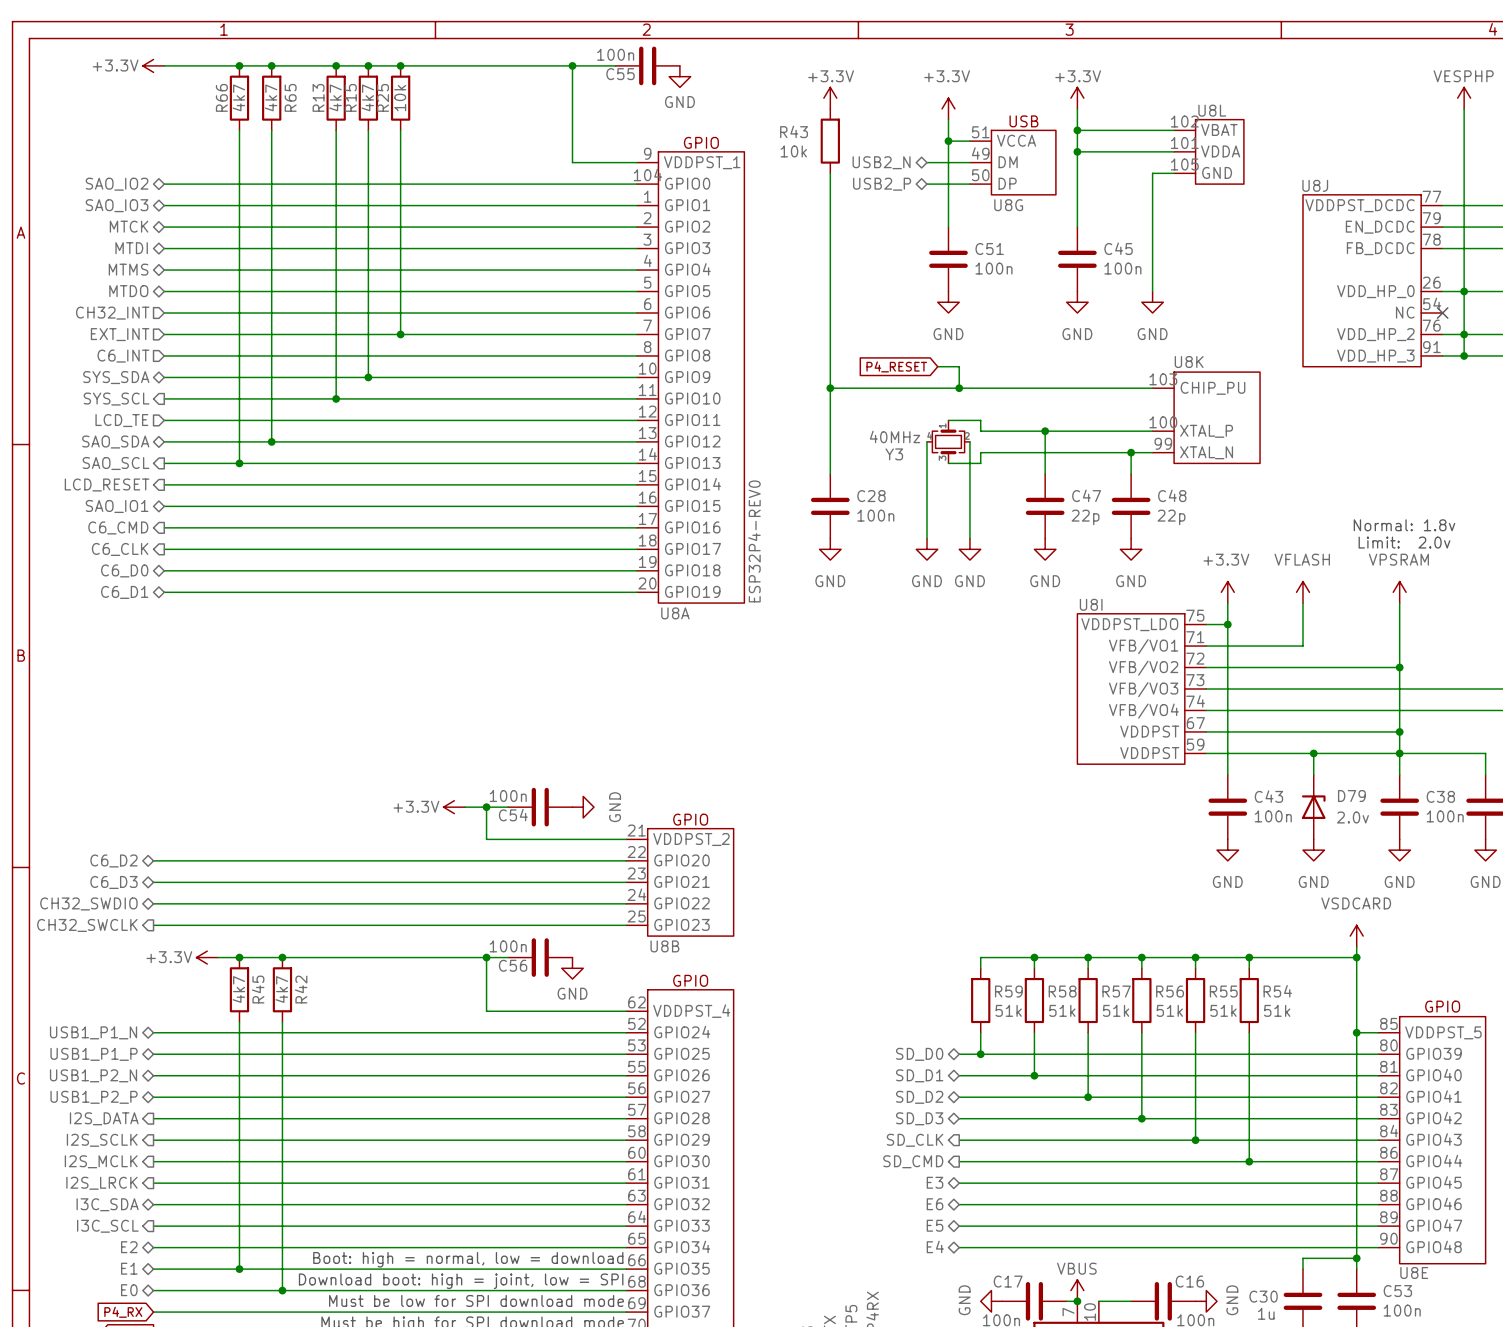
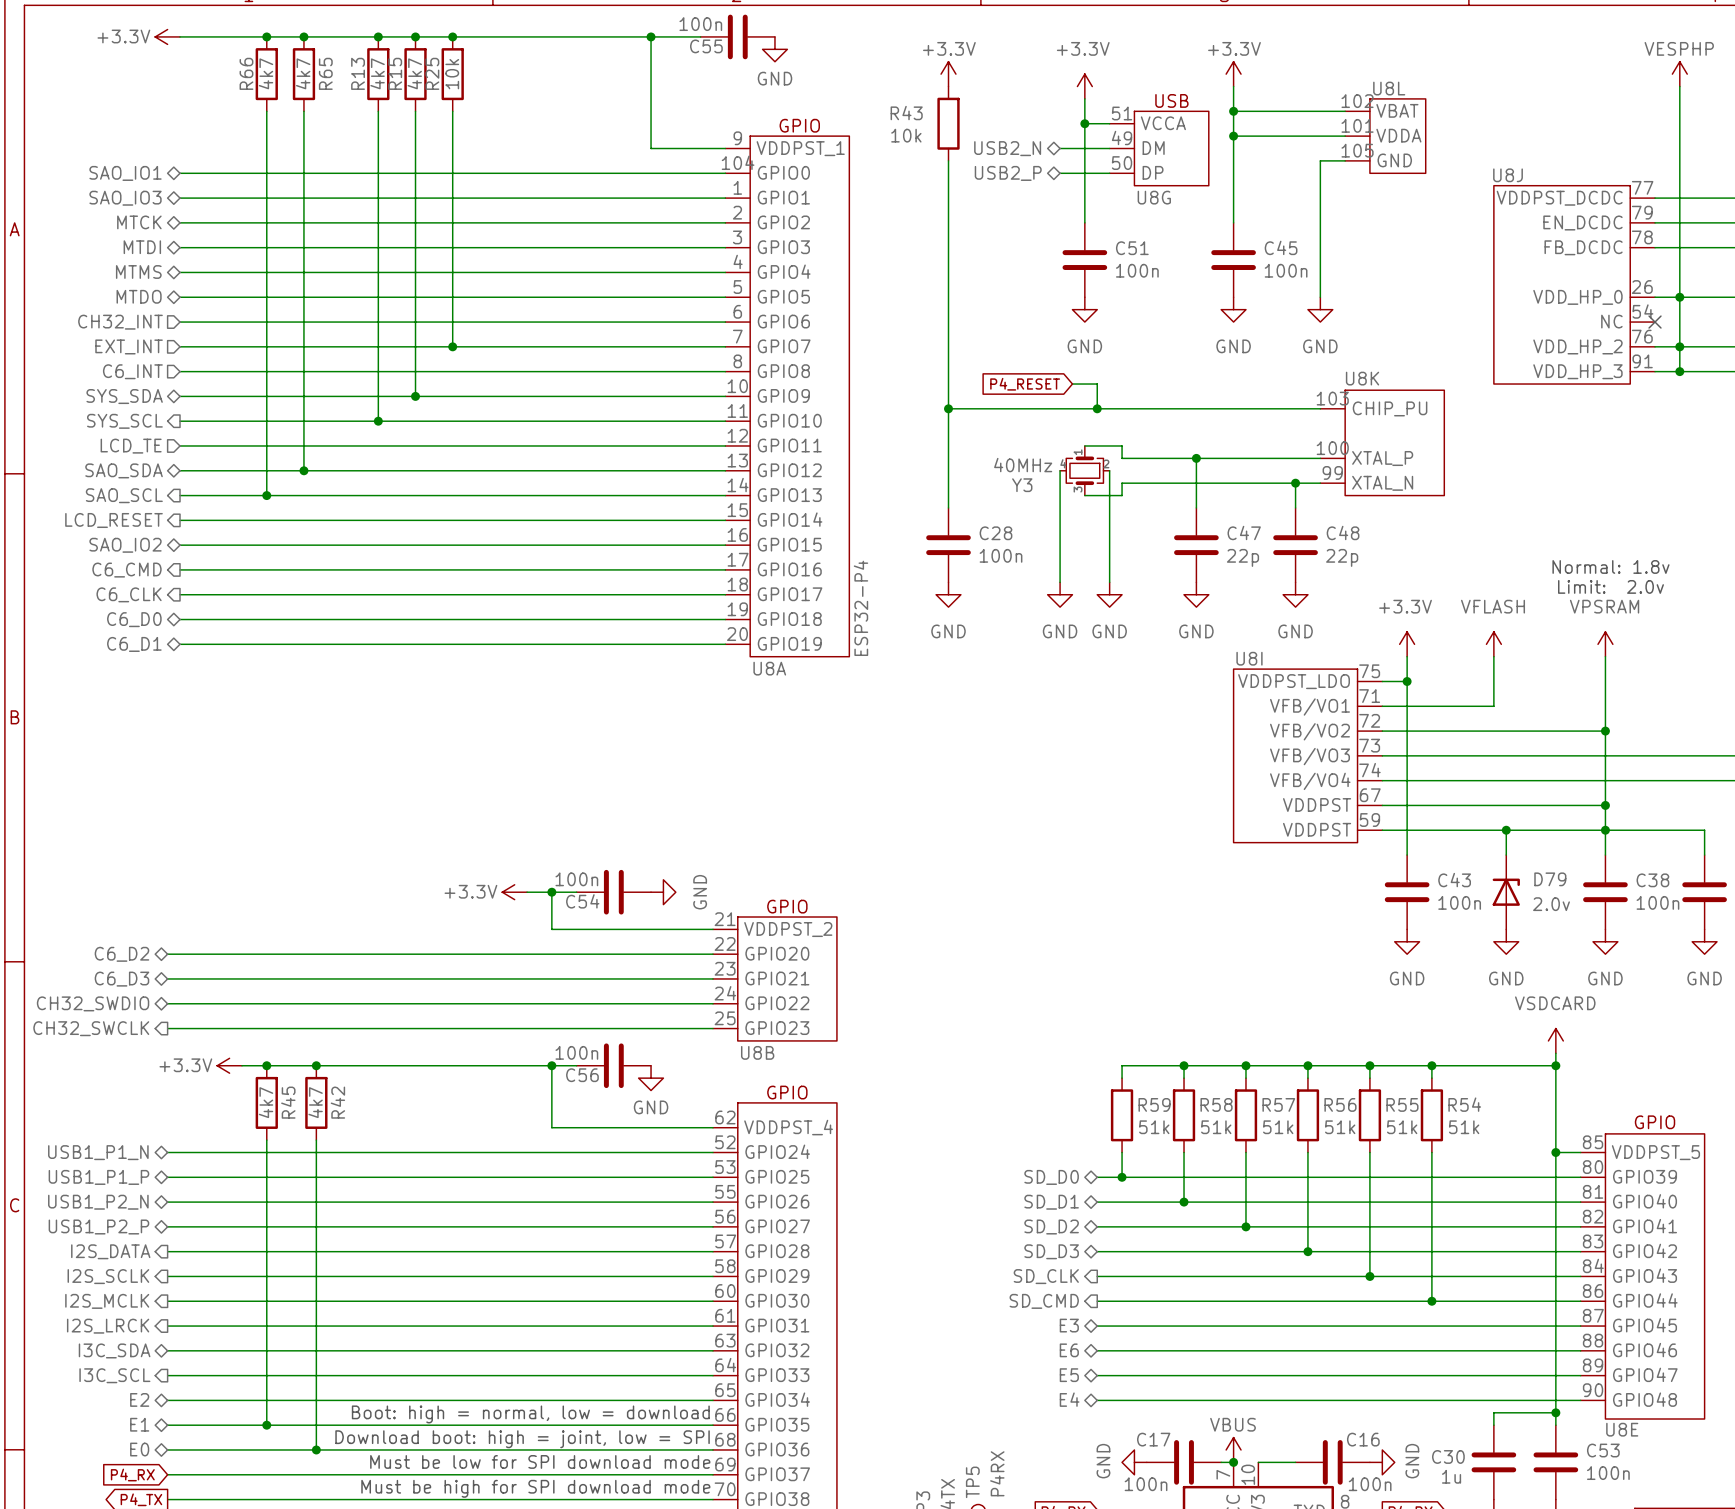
hierarchical label: SAO_IO2 (117, 184) -> SAO_IO1 (125, 173)
hierarchical label: SAO_IO1 (117, 506) -> SAO_IO2 (125, 545)
U8A value: ESP32P4-REV0 (754, 541) -> ESP32-P4 (860, 608)

